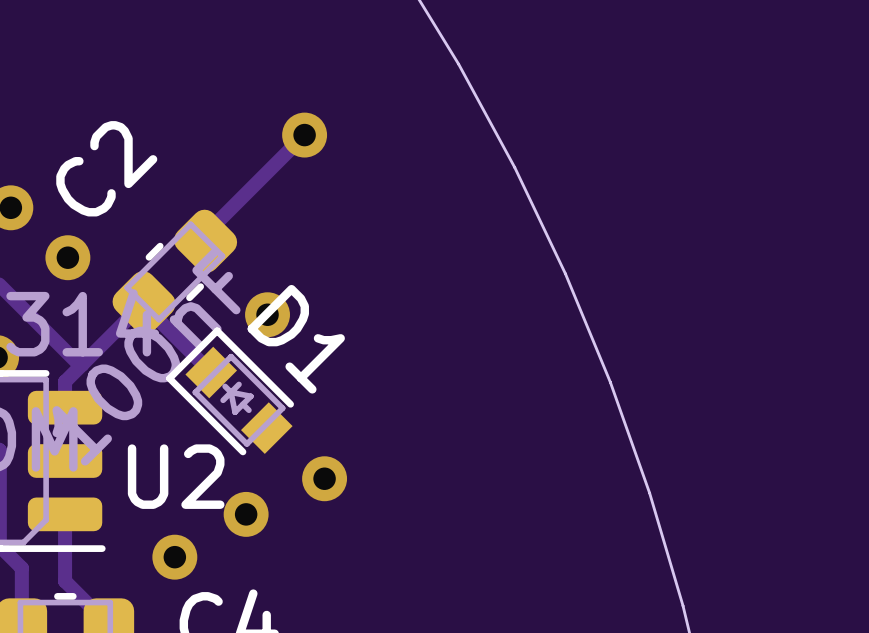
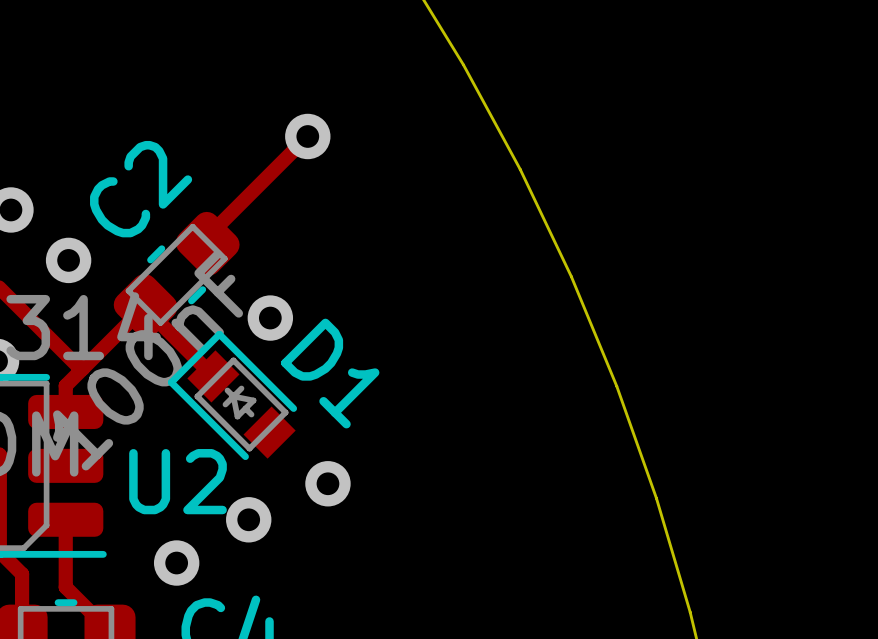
C2 name position: C2 (106, 168) -> C2 (141, 189)
D1 name position: D1 (296, 339) -> D1 (330, 373)

